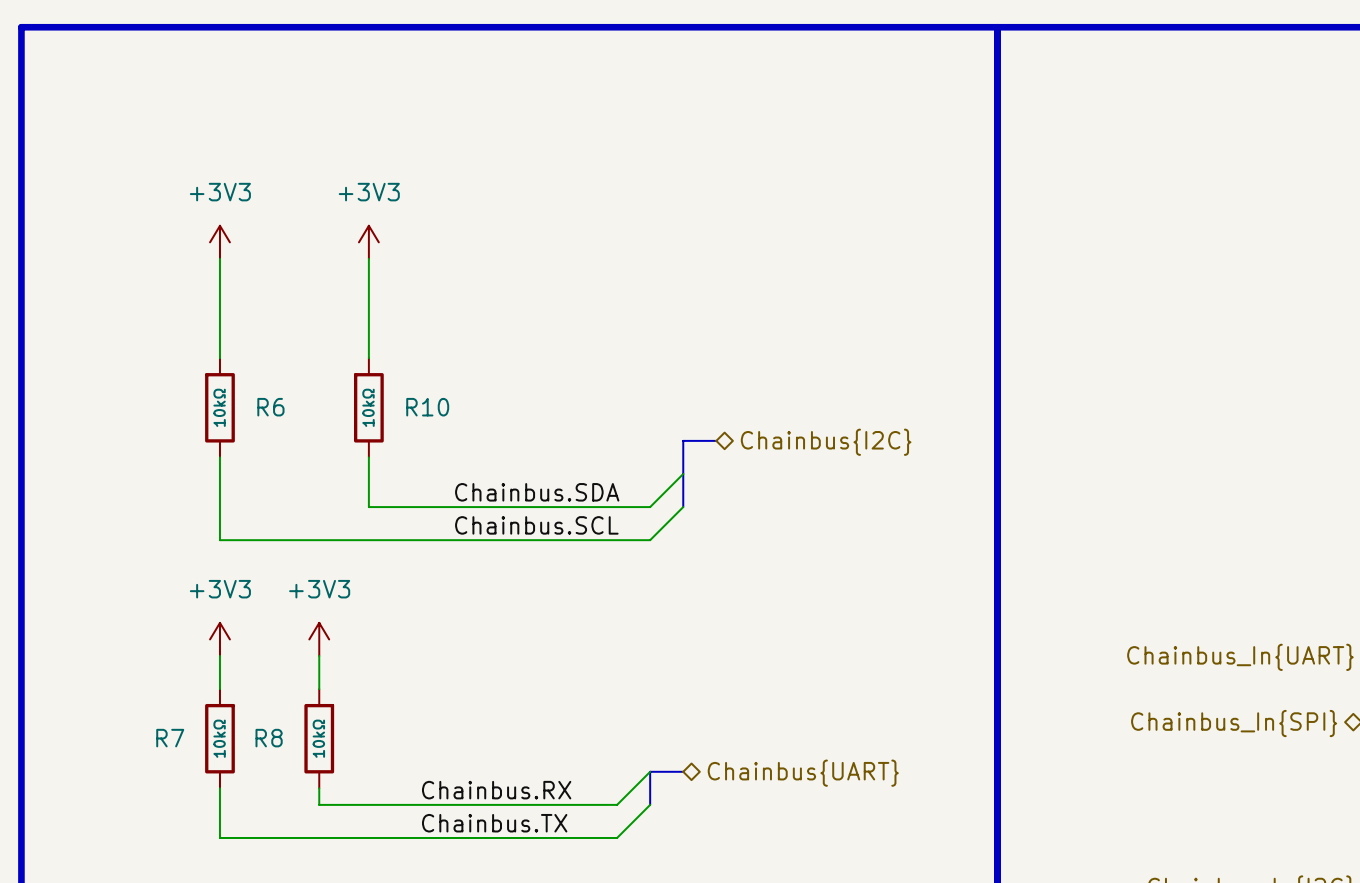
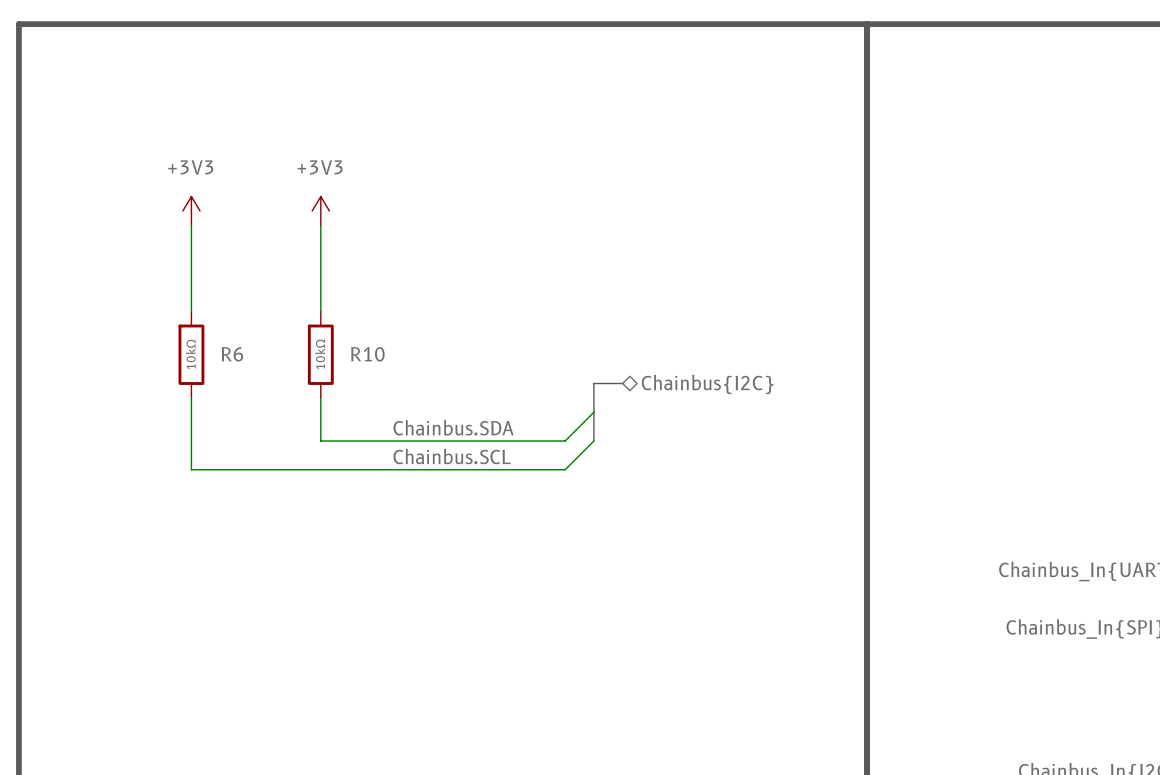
power symbol: +3V3 (219, 639) -> none
power symbol: +3V3 (319, 639) -> none
wire: (219, 655) (219, 689) -> none
wire: (319, 655) (319, 689) -> none
R7: 10kΩ (219, 738) -> none
R8: 10kΩ (319, 738) -> none
wire: (650, 771) (617, 804) (319, 804) (319, 788) -> none
bus: (683, 771) (650, 771) (650, 804) -> none
hierarchical label: Chainbus{UART} (803, 773) -> none
wire: (219, 788) (219, 837) (617, 837) (650, 804) -> none
label: Chainbus.RX (496, 790) -> none
label: Chainbus.TX (494, 823) -> none

